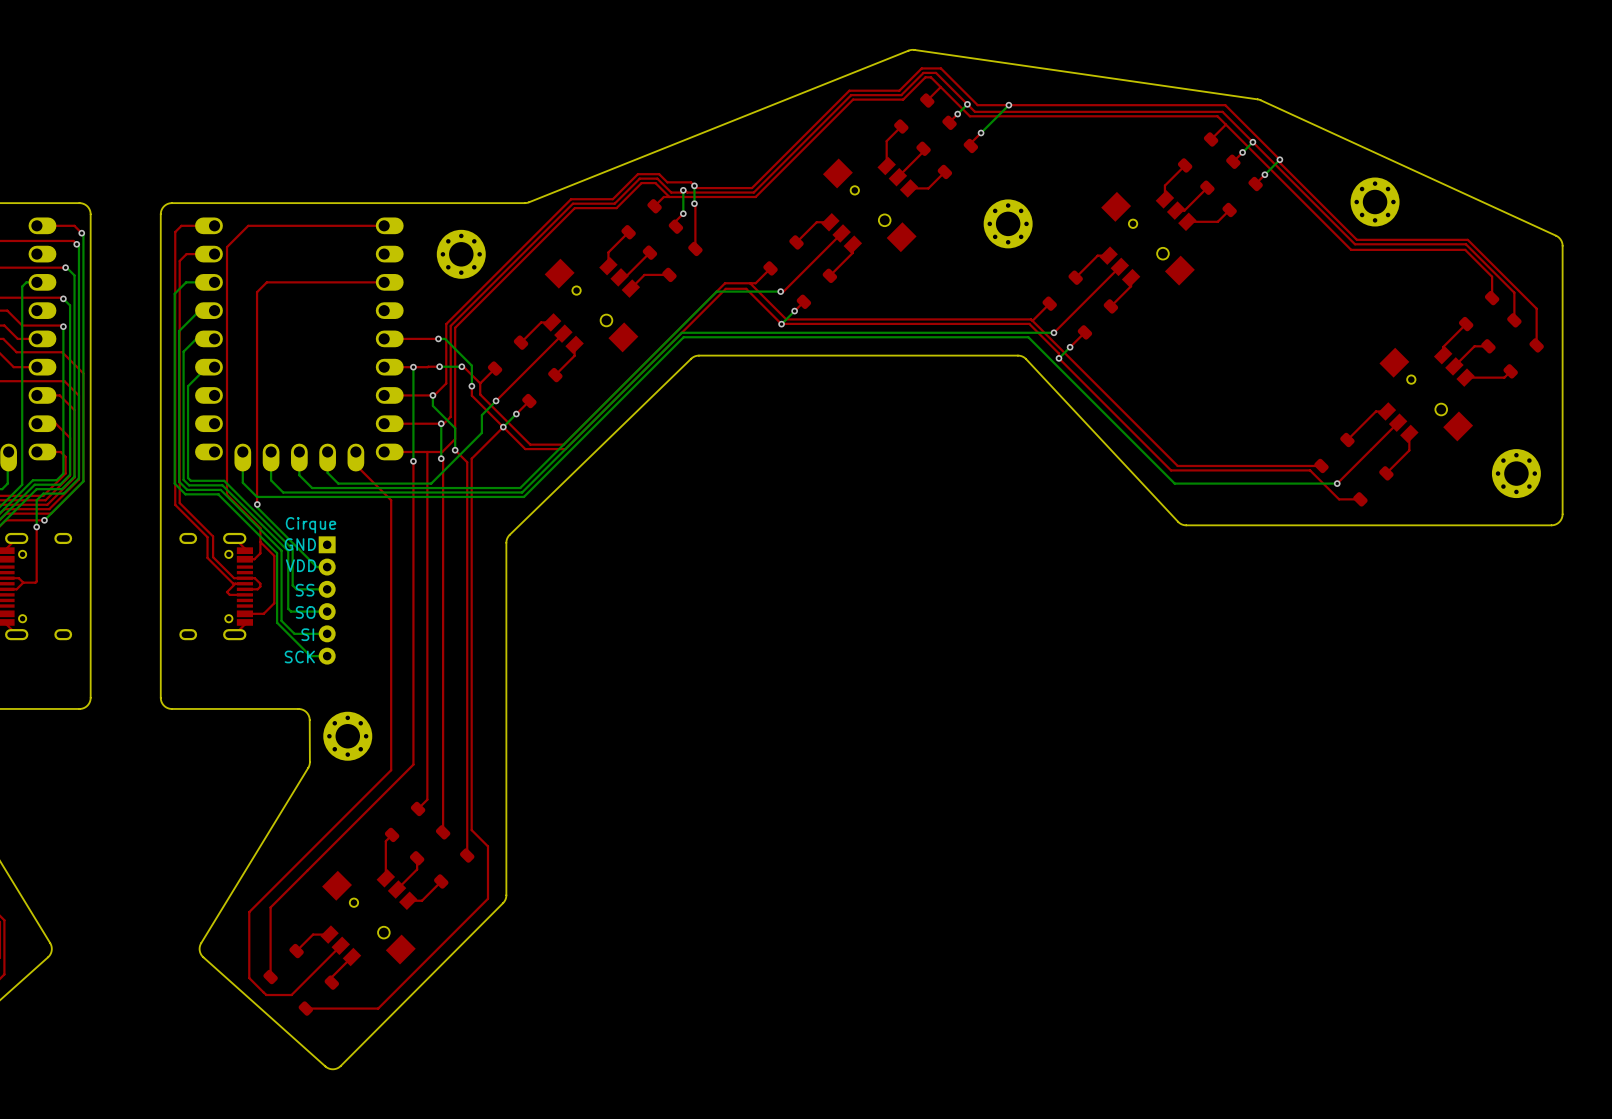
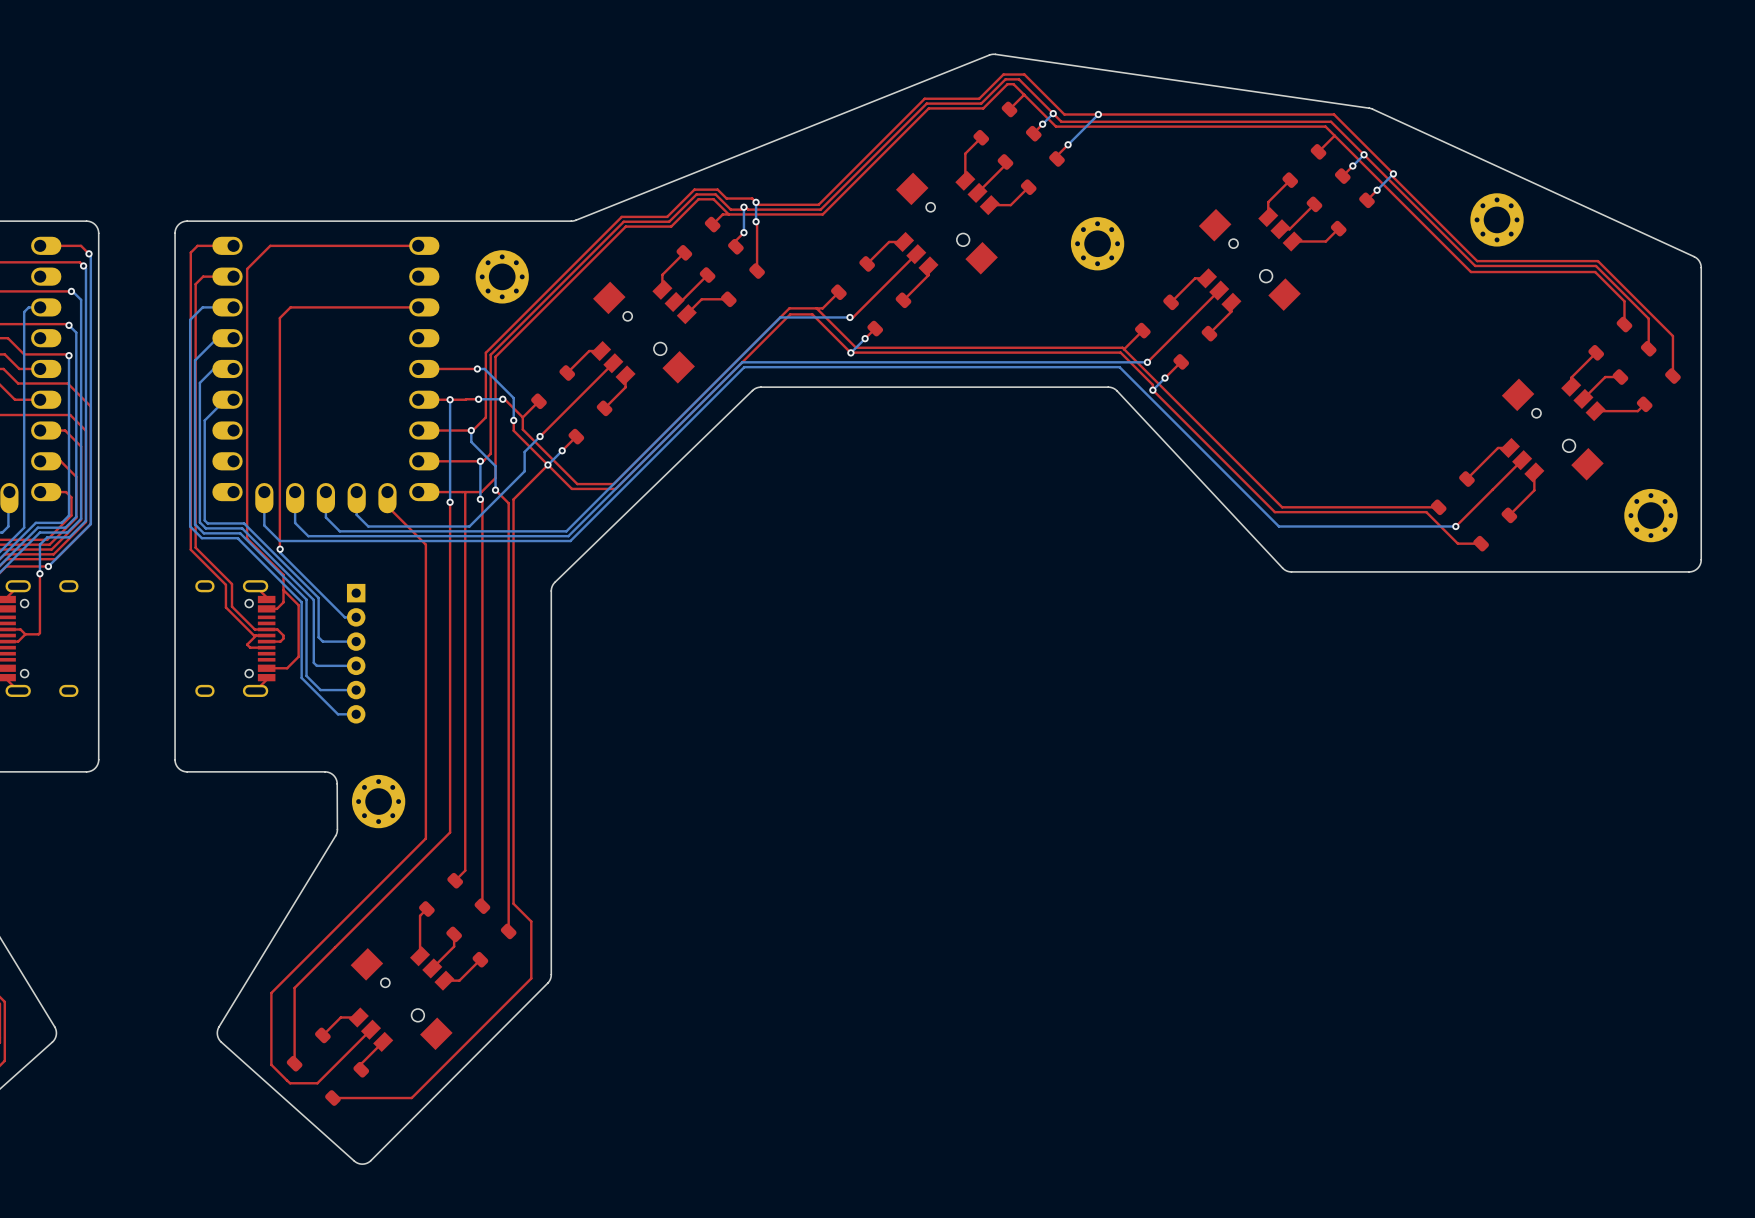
text: Cirque (311, 525) -> none
text: GND (300, 544) -> none
text: VDD (300, 565) -> none
text: SS (305, 590) -> none
text: SO (305, 612) -> none
text: SI (307, 634) -> none
text: SCK (299, 656) -> none

